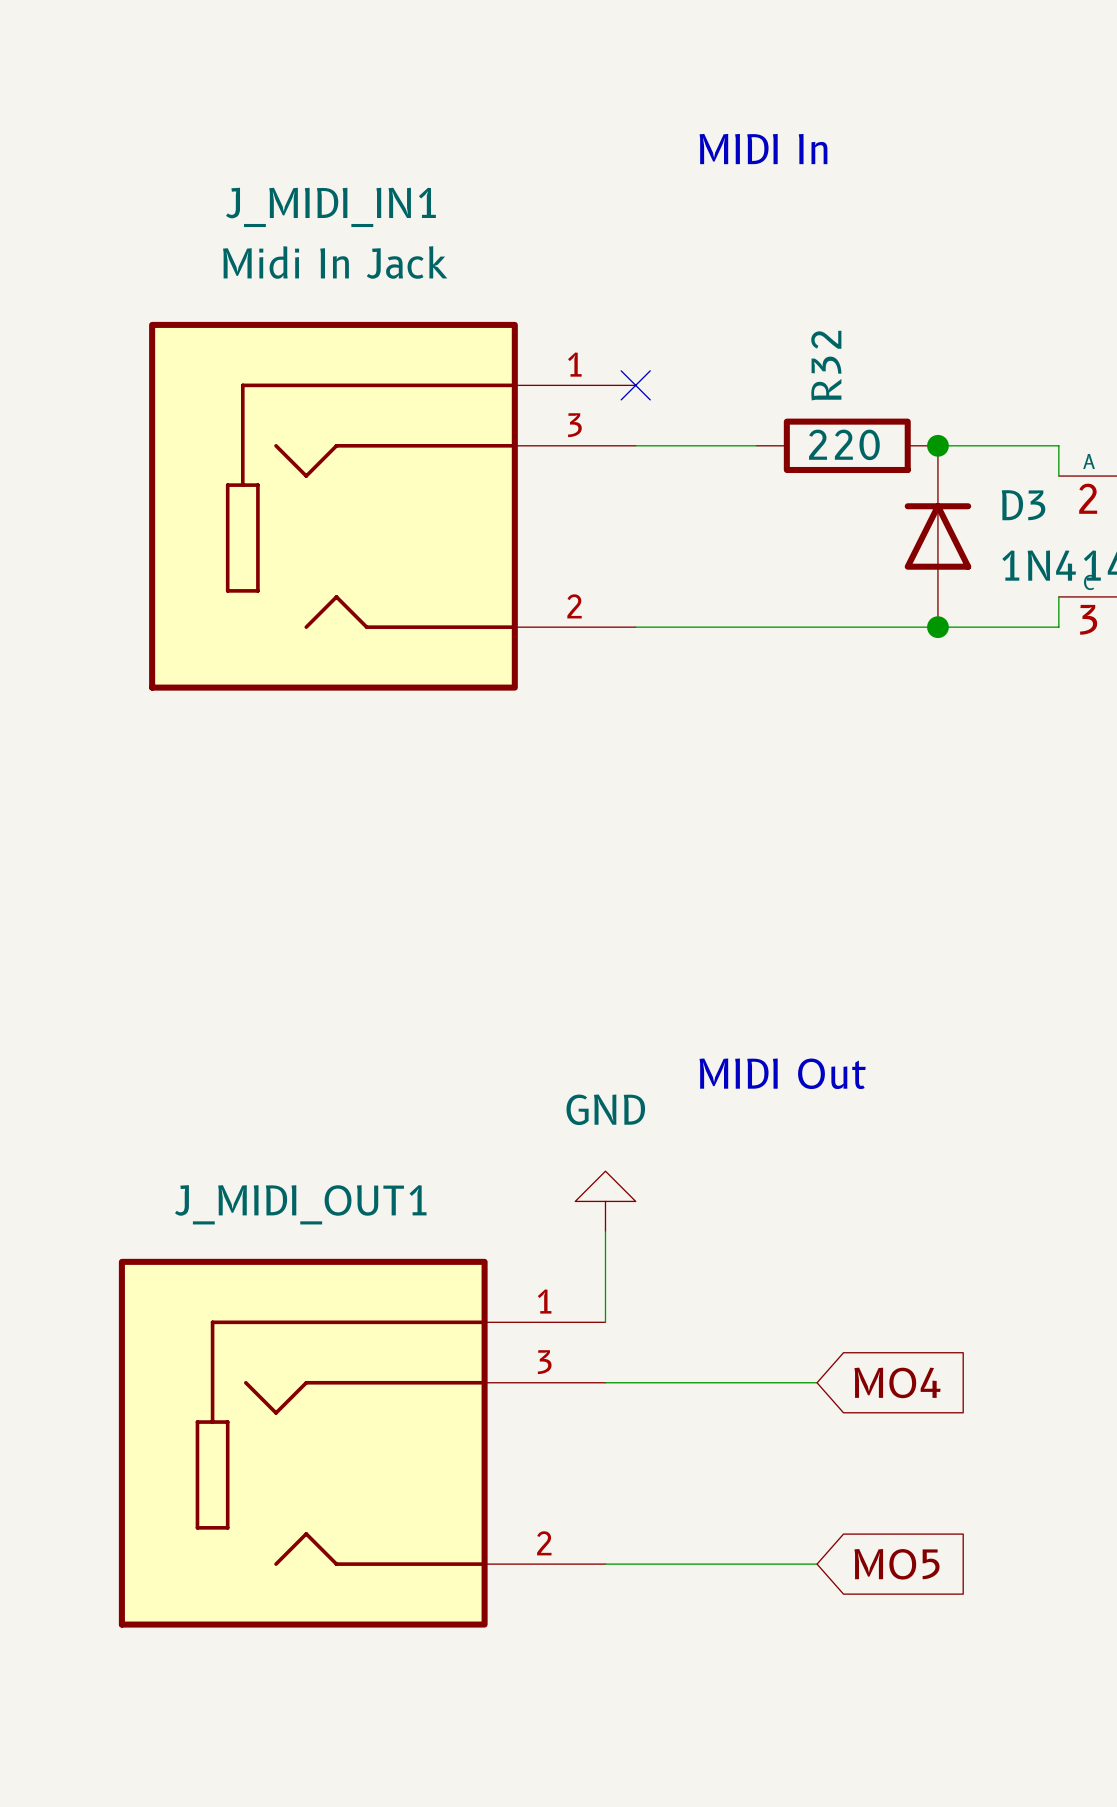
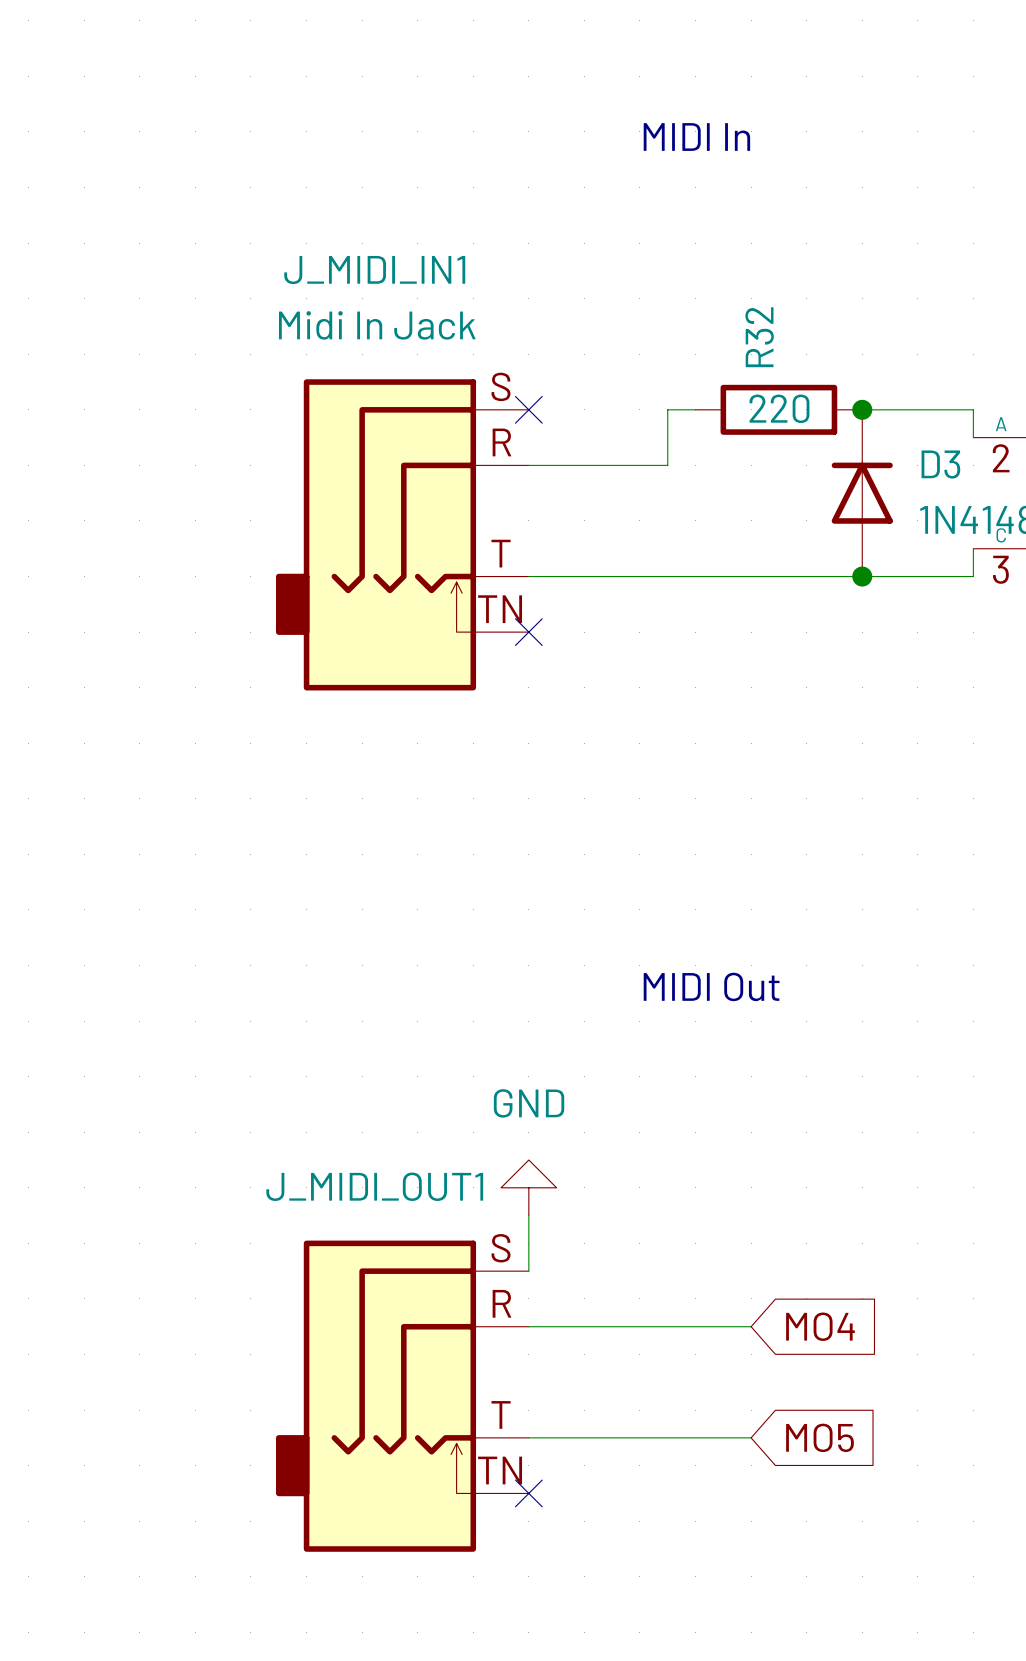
J_MIDI_IN1 symbol: [149, 321, 636, 691] -> [275, 379, 529, 691]
no-connect mark position: (635, 385) -> (528, 409)
wire: (635, 445) (726, 445) -> (528, 465) (667, 465) (667, 409)
no-connect mark: none -> (528, 632)
power symbol position: GND (605, 1201) -> GND (528, 1187)
wire: (605, 1231) (605, 1322) -> none
J_MIDI_OUT1 symbol: [118, 1258, 606, 1628] -> [275, 1240, 529, 1552]
wire: none -> (528, 1215) (528, 1271)
wire: (605, 1382) (817, 1382) -> none
global label position: MO4 (897, 1382) -> MO4 (820, 1326)
wire: none -> (528, 1326) (751, 1326)
no-connect mark: none -> (528, 1493)

